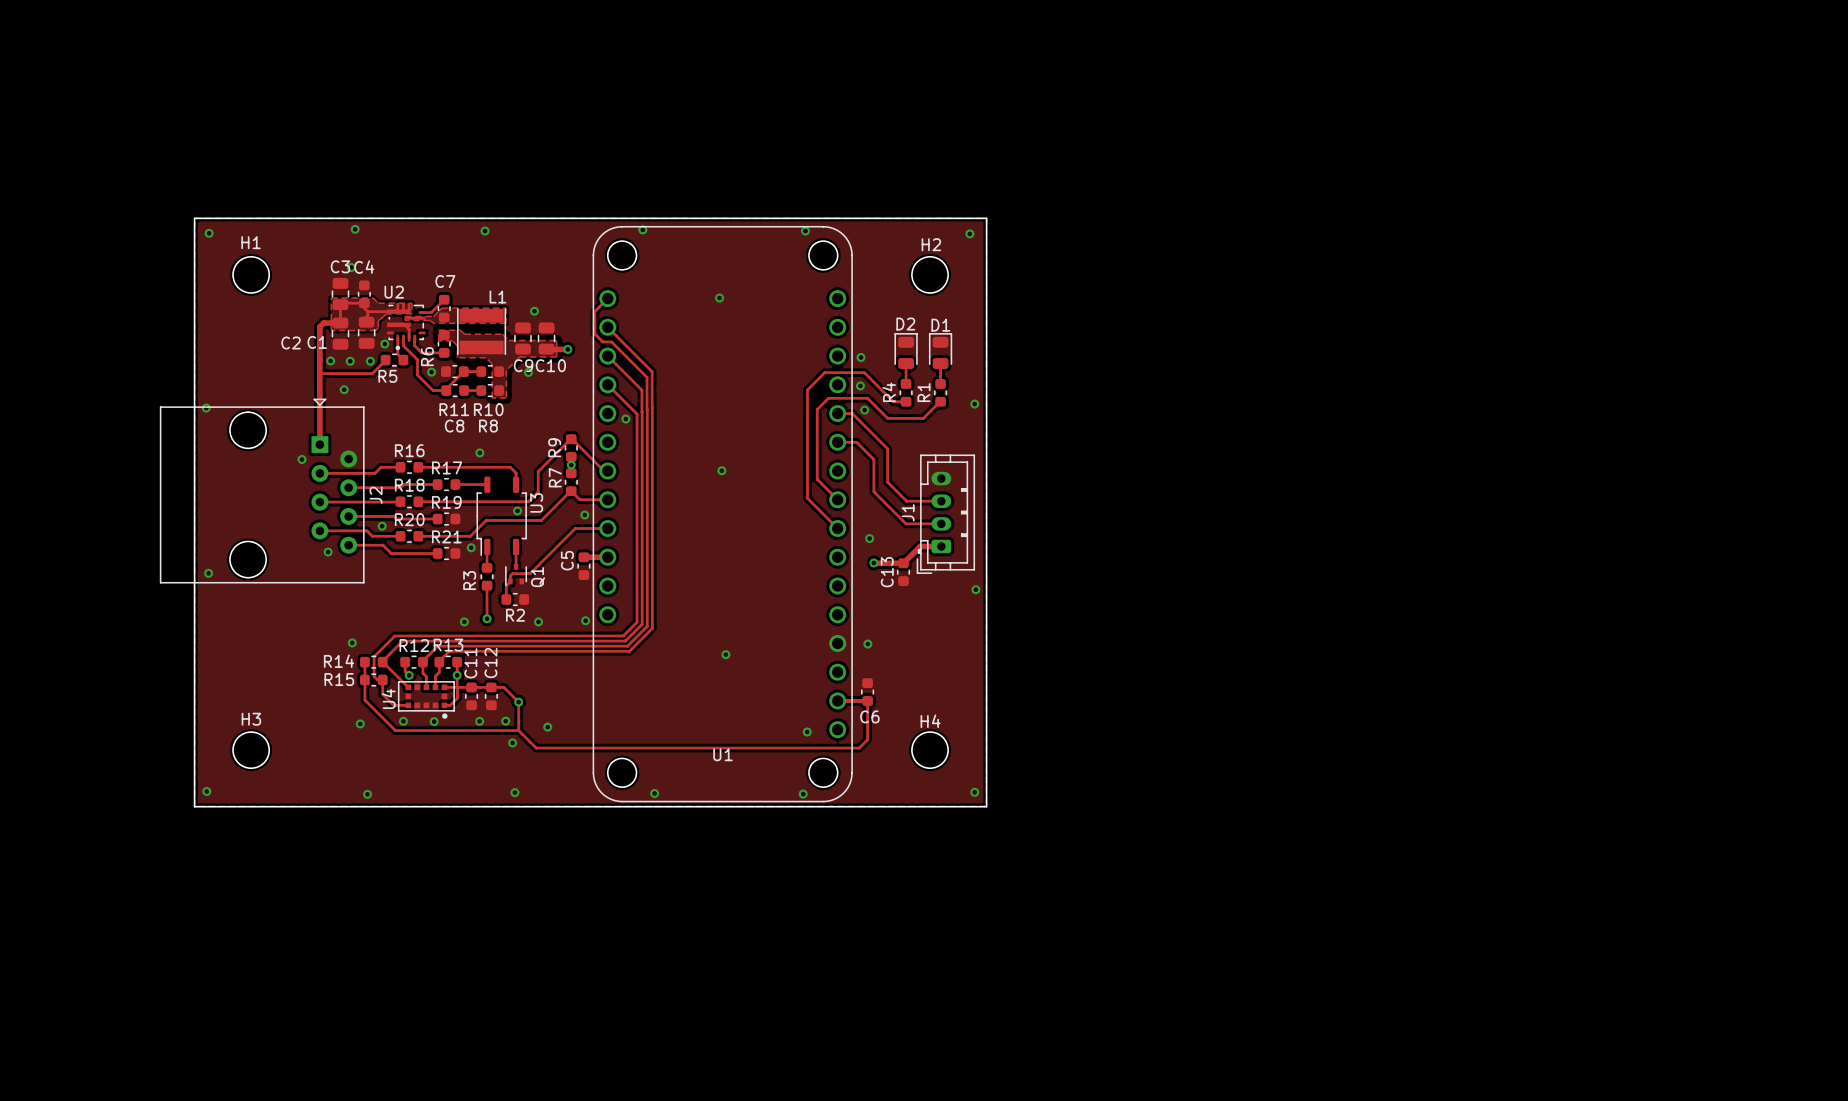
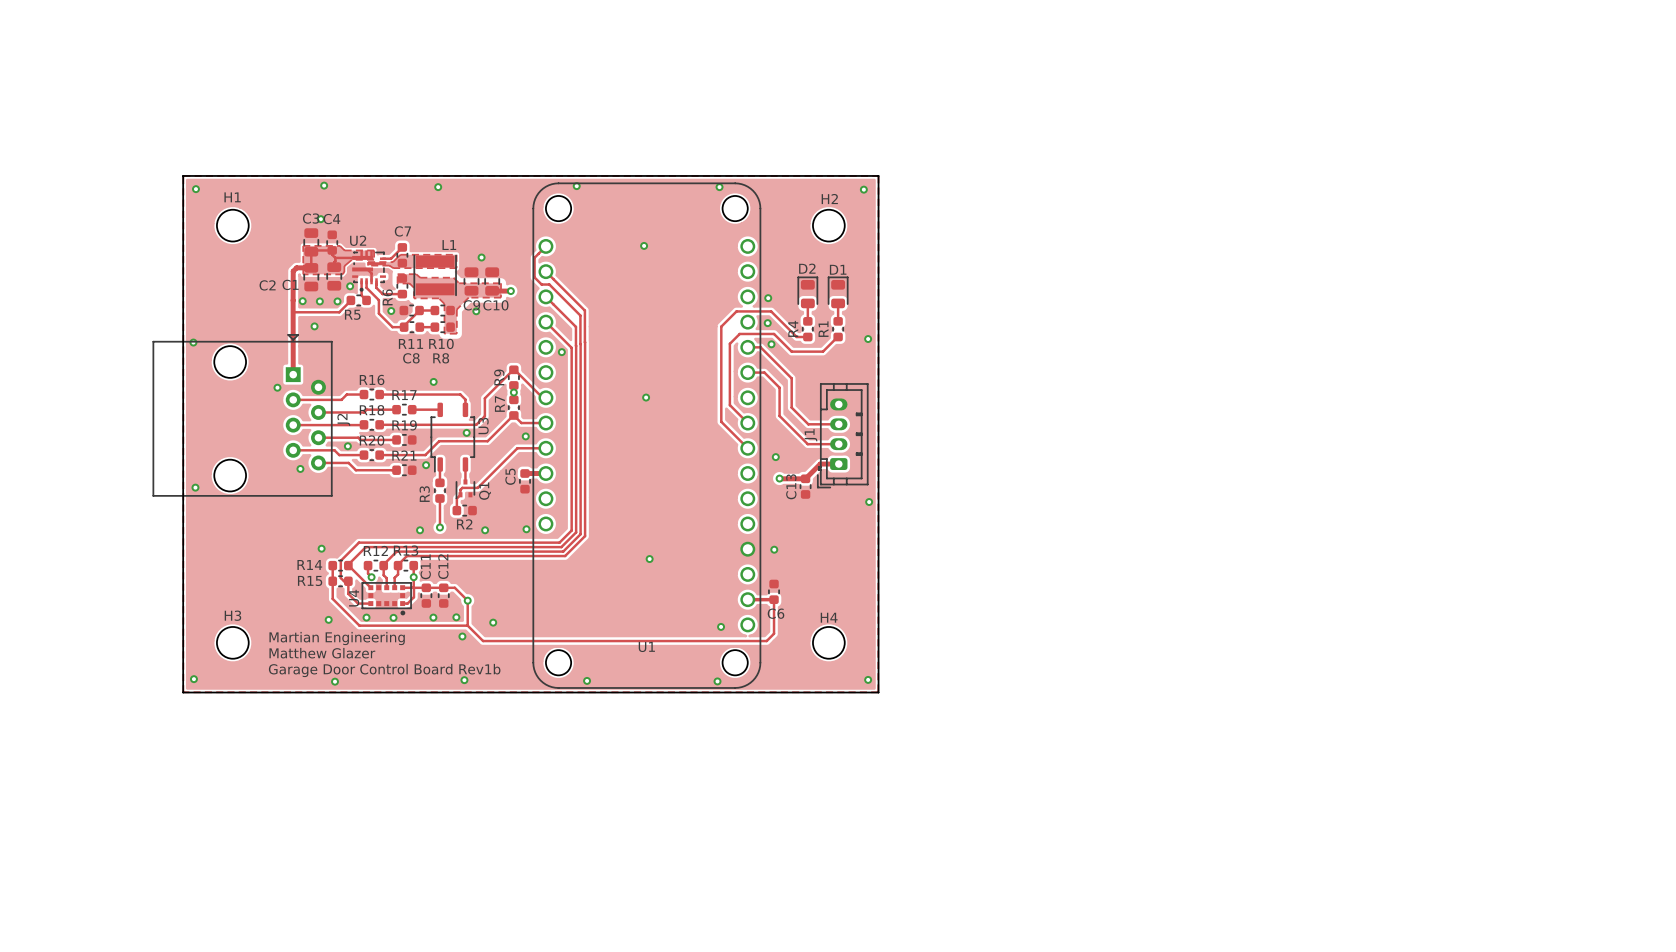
text: none -> Martian Engineering (337, 638)
text: none -> Matthew Glazer (322, 653)
text: none -> Garage Door Control Board Rev1b (384, 670)

